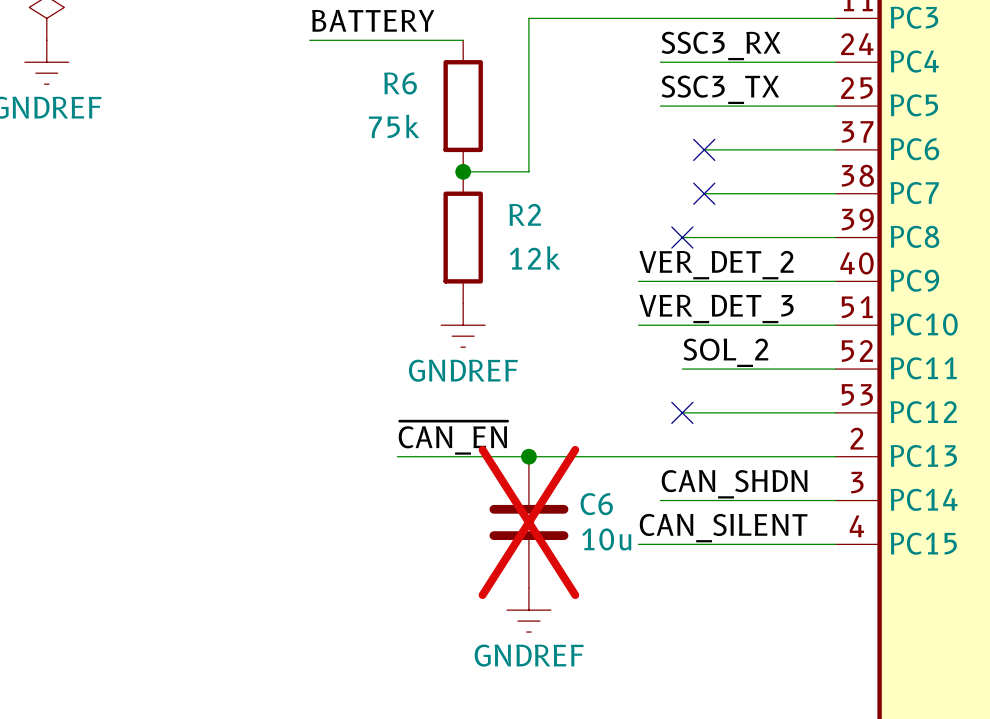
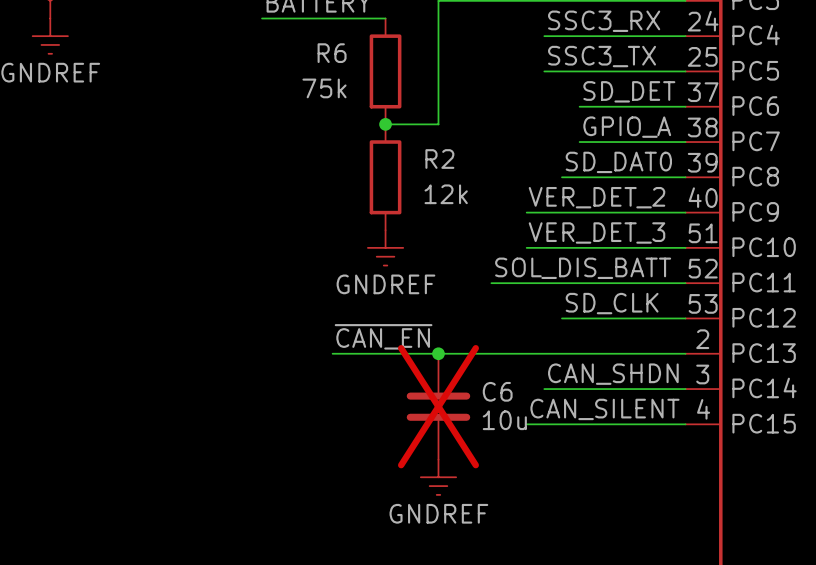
label: none -> SD_DET (629, 91)
no-connect mark: (704, 149) -> none
label: none -> GPIO_A (627, 127)
no-connect mark: (704, 193) -> none
label: none -> SD_DAT0 (618, 162)
no-connect mark: (682, 237) -> none
label: none -> SOL_DIS_BATT (583, 268)
label: SOL_2 (725, 352) -> none
wire: none -> (491, 283) (561, 283)
label: none -> SD_CLK (612, 303)
no-connect mark: (682, 412) -> none

